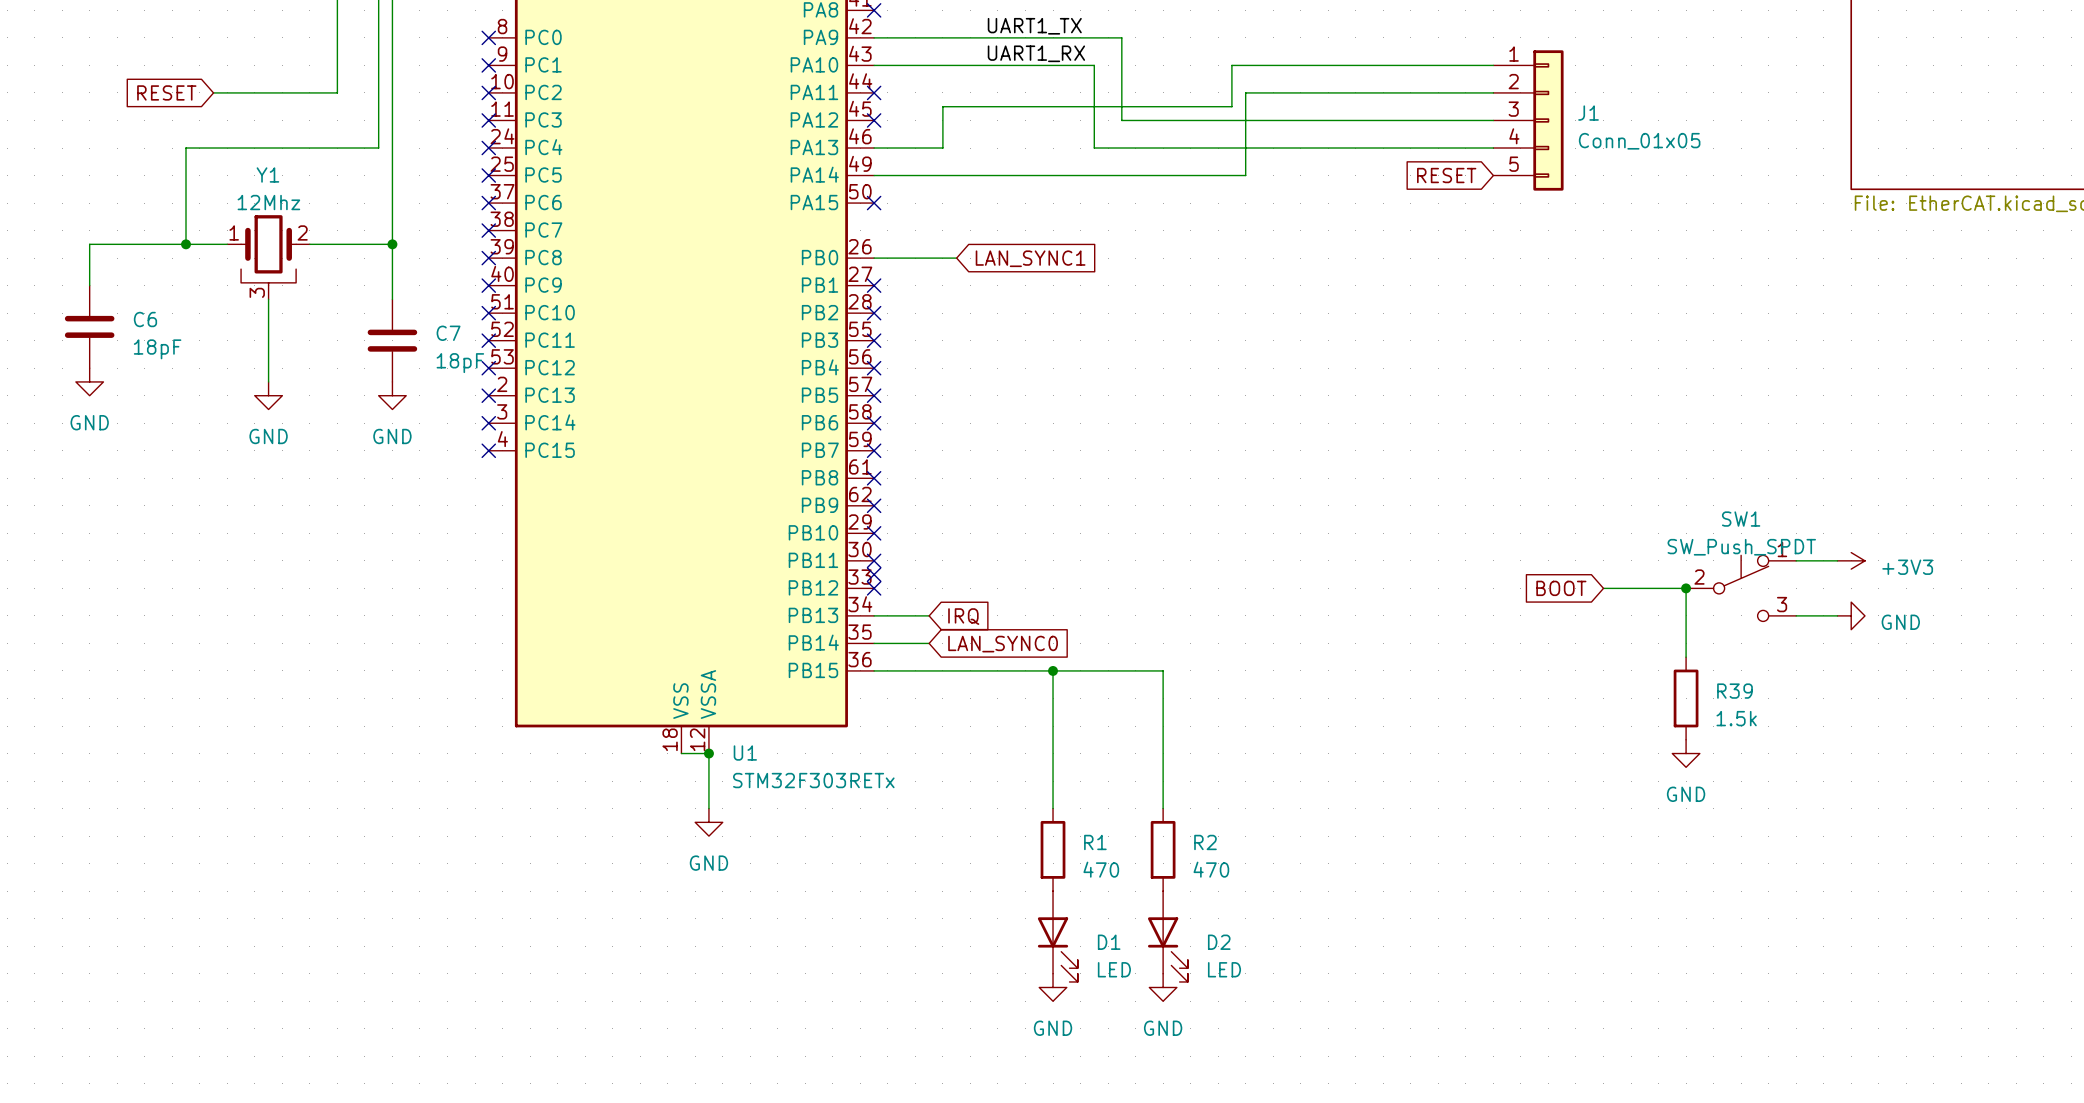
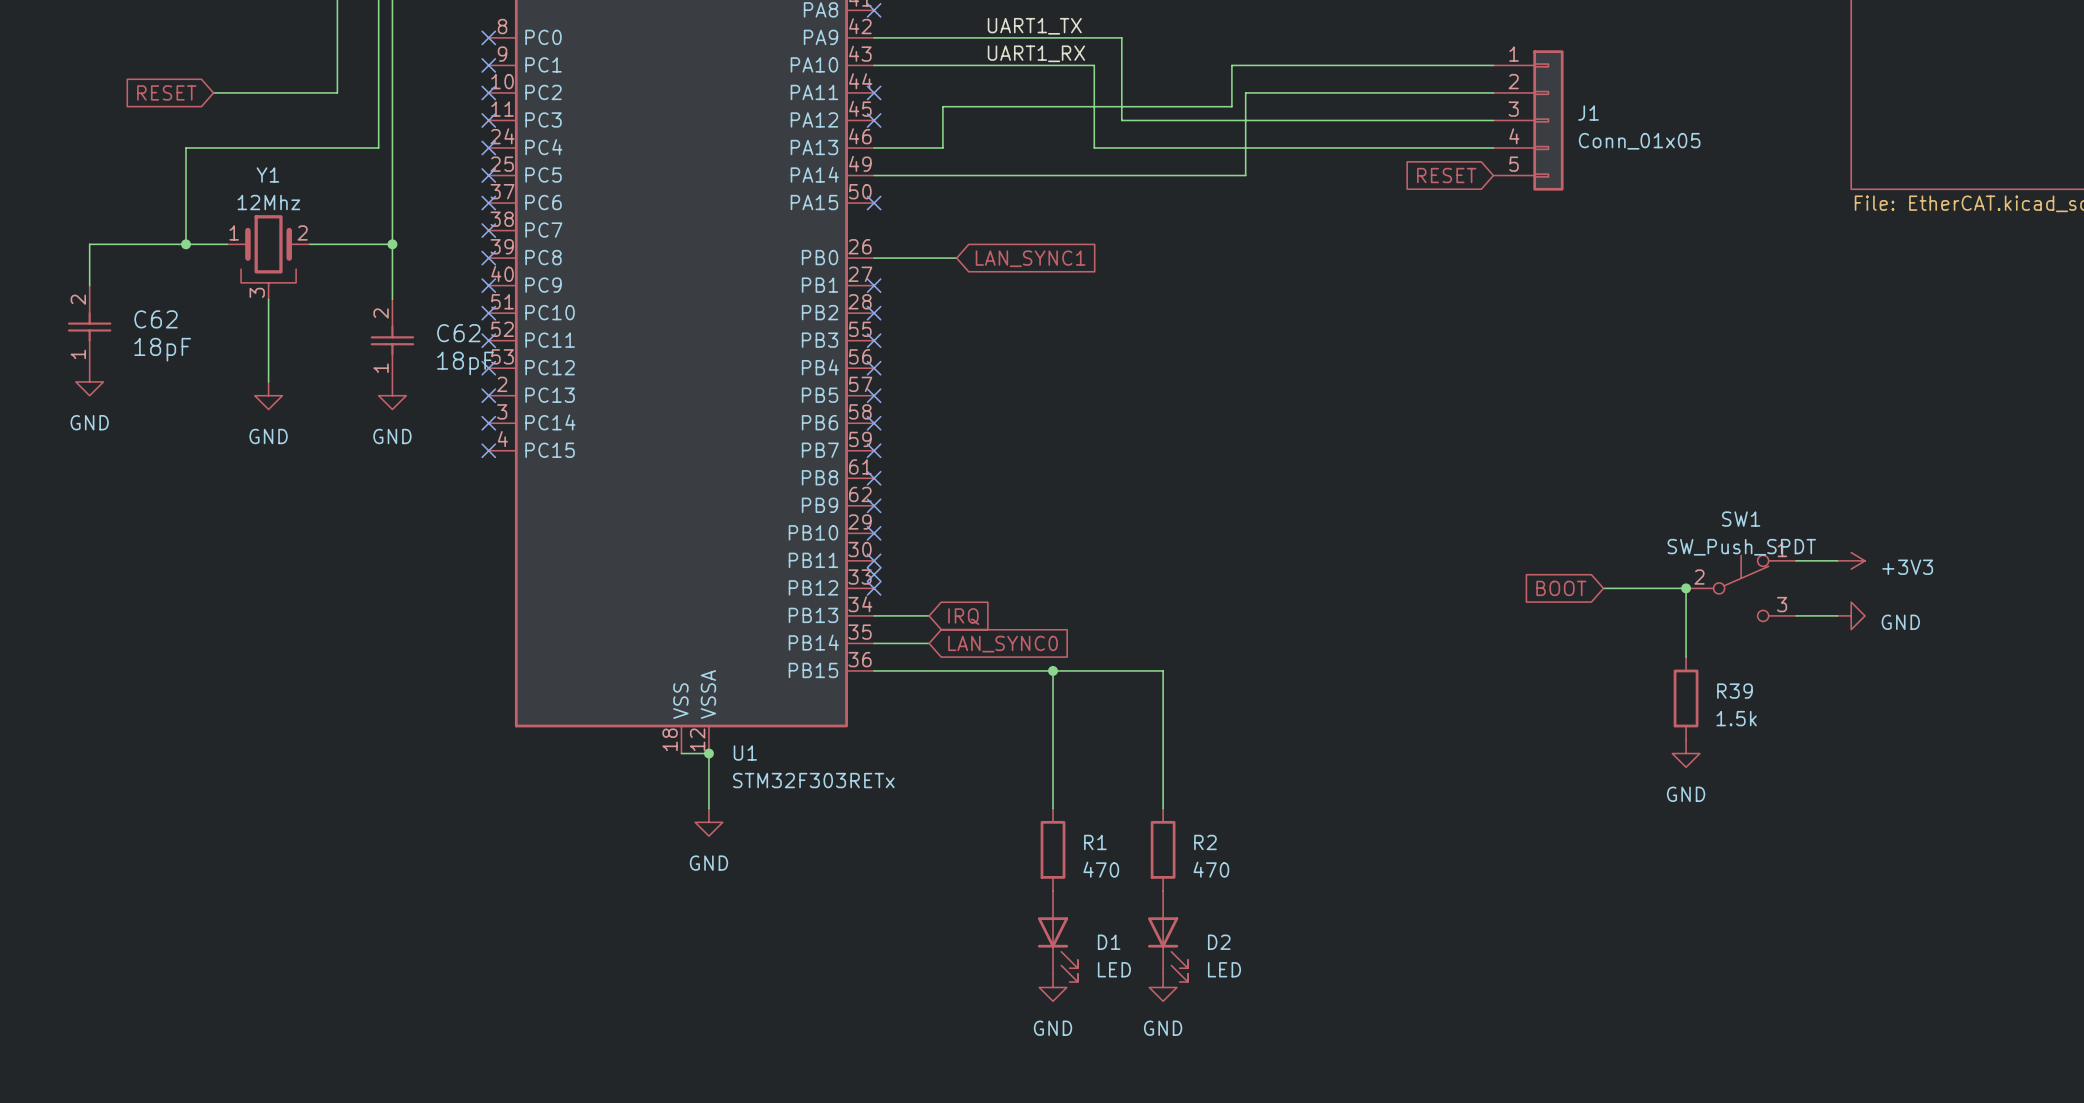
C6: 18pF (89, 326) -> none
C62: none -> 18pF (89, 326)
C7: 18pF (392, 340) -> none
C62: none -> 18pF (392, 340)

